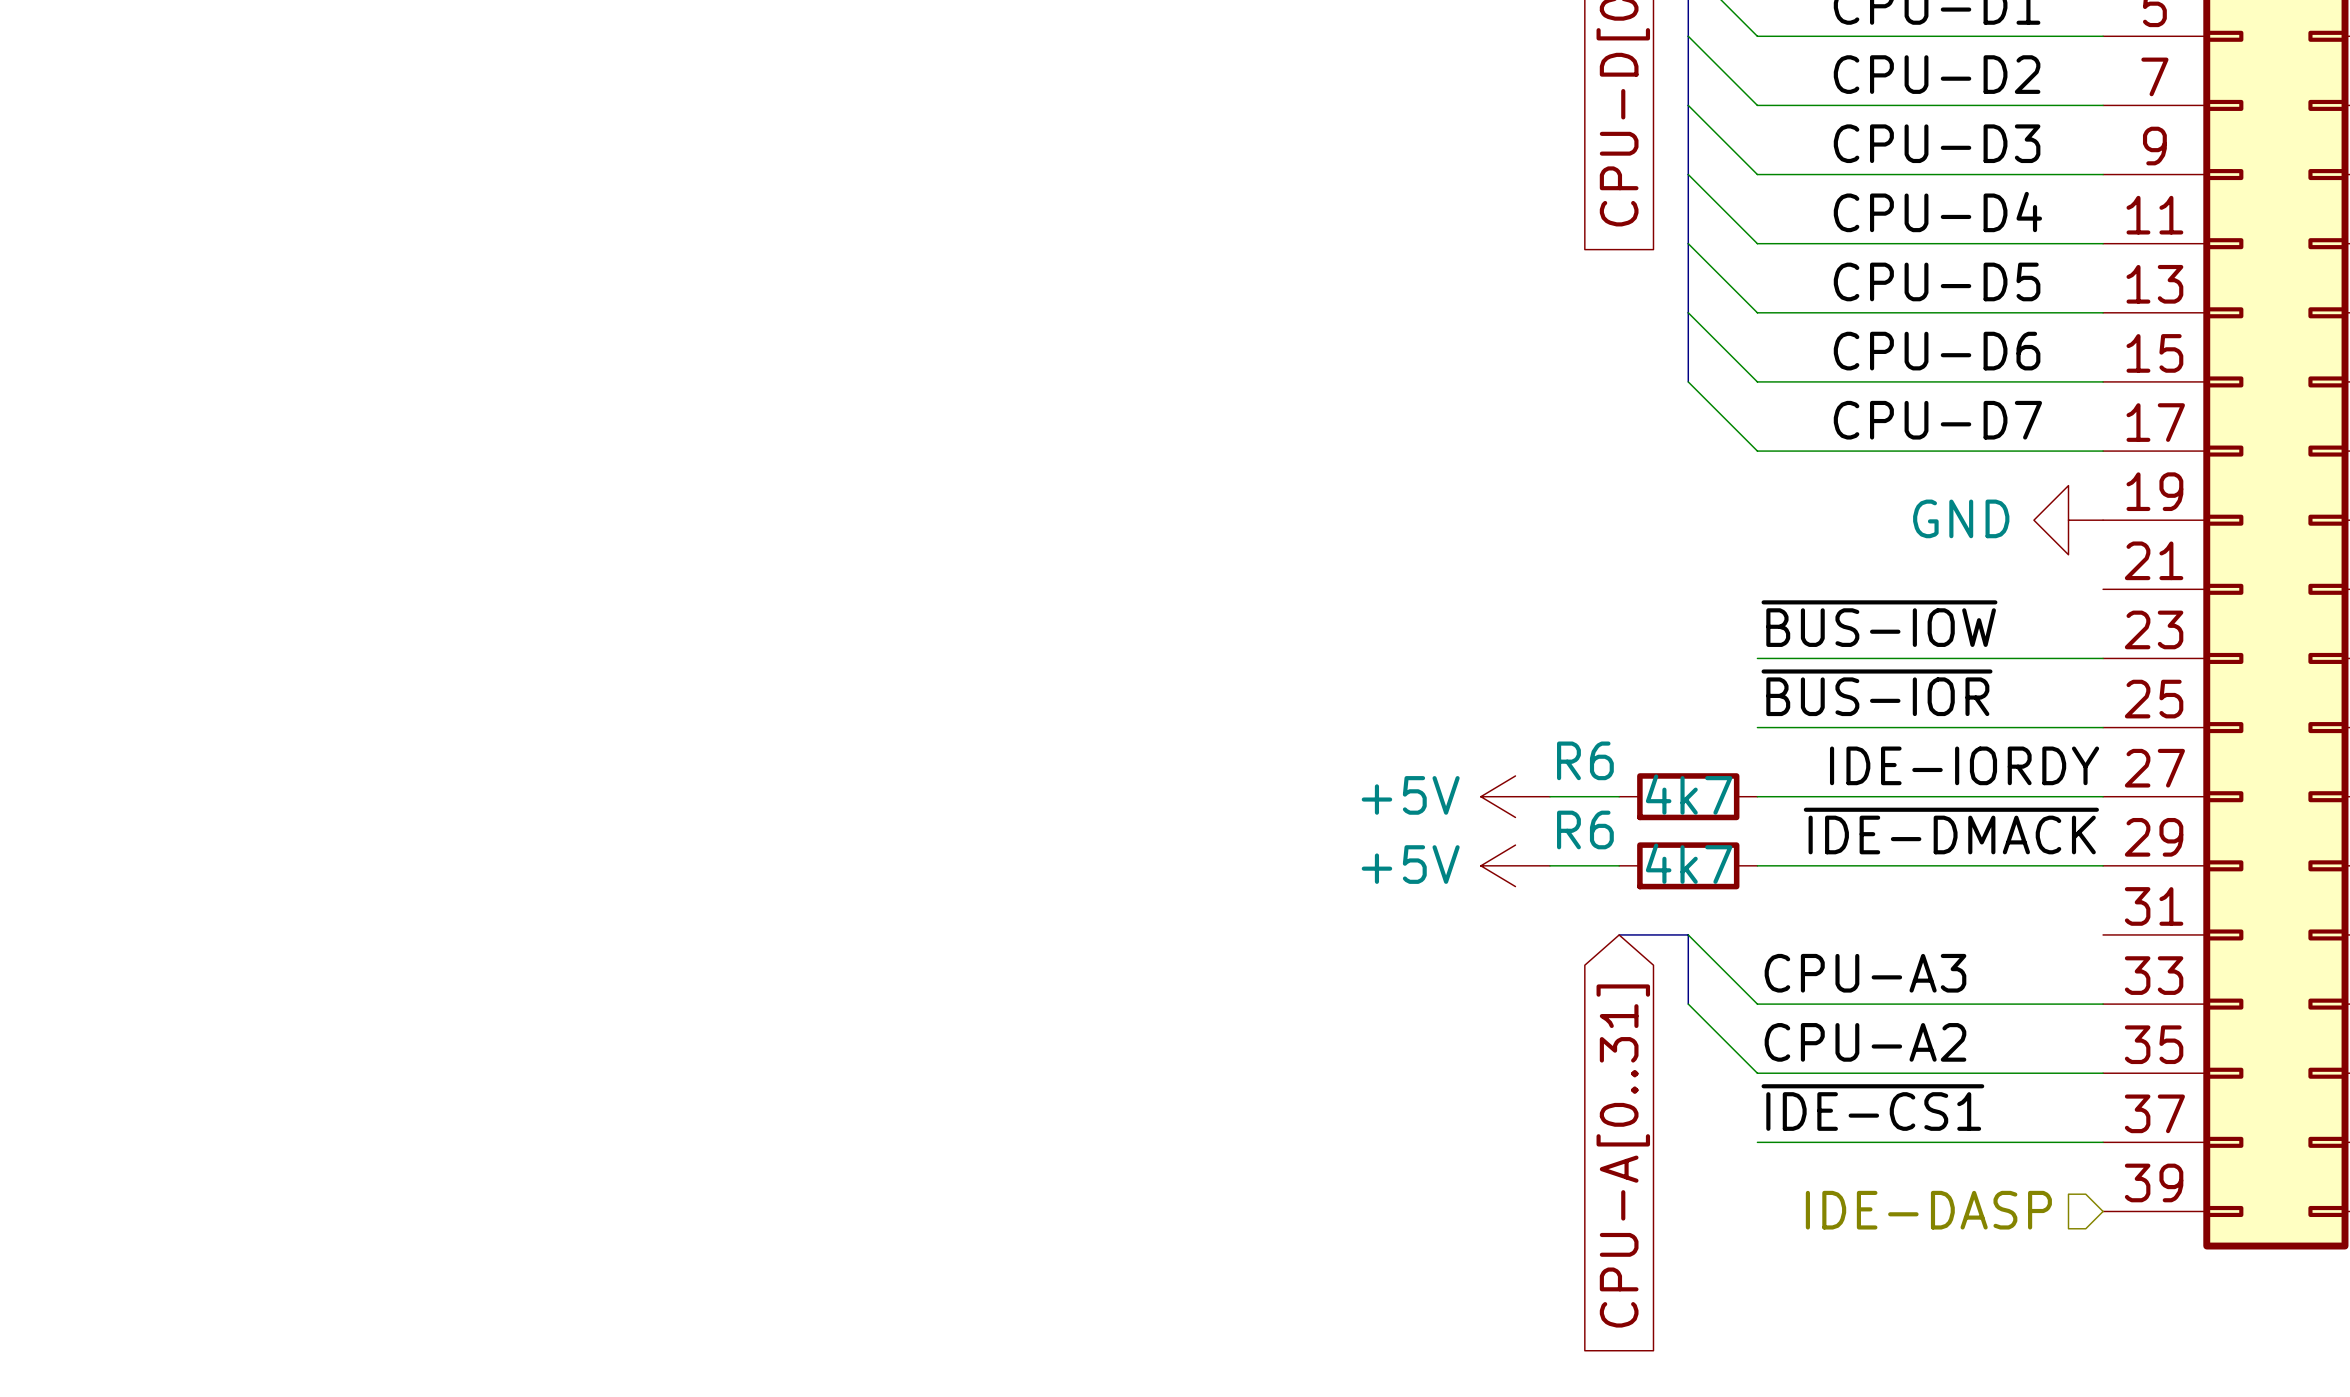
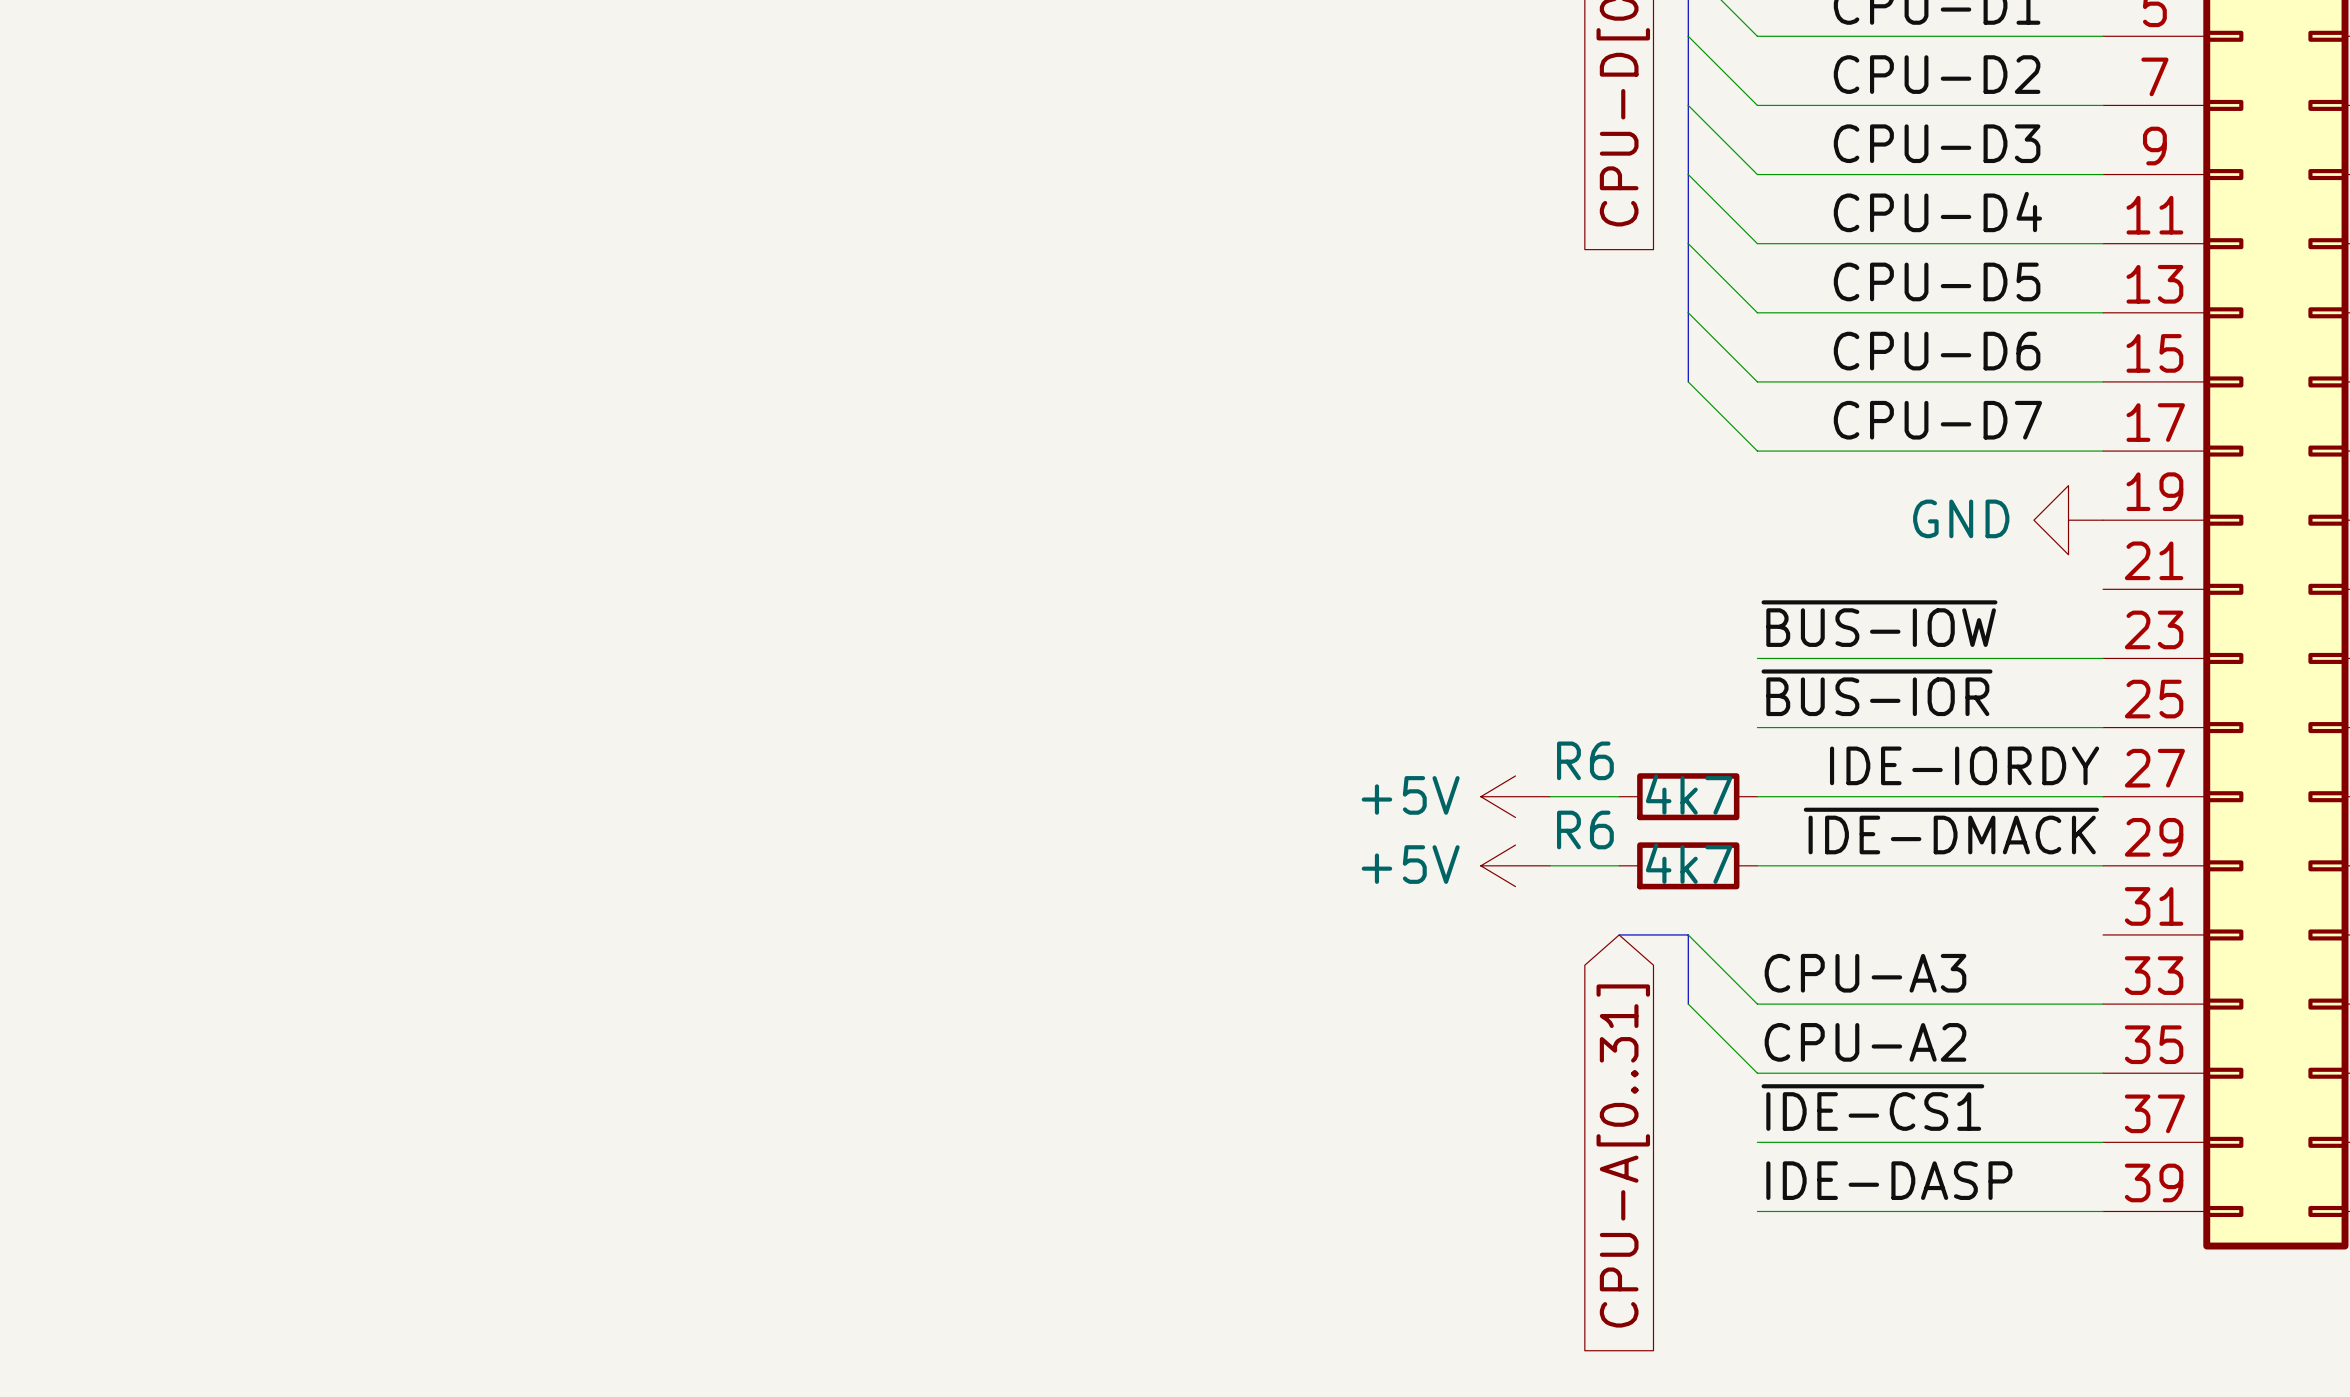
label: none -> IDE-DASP (1889, 1180)
hierarchical label: IDE-DASP (1928, 1210) -> none
wire: none -> (1757, 1211) (2103, 1211)

